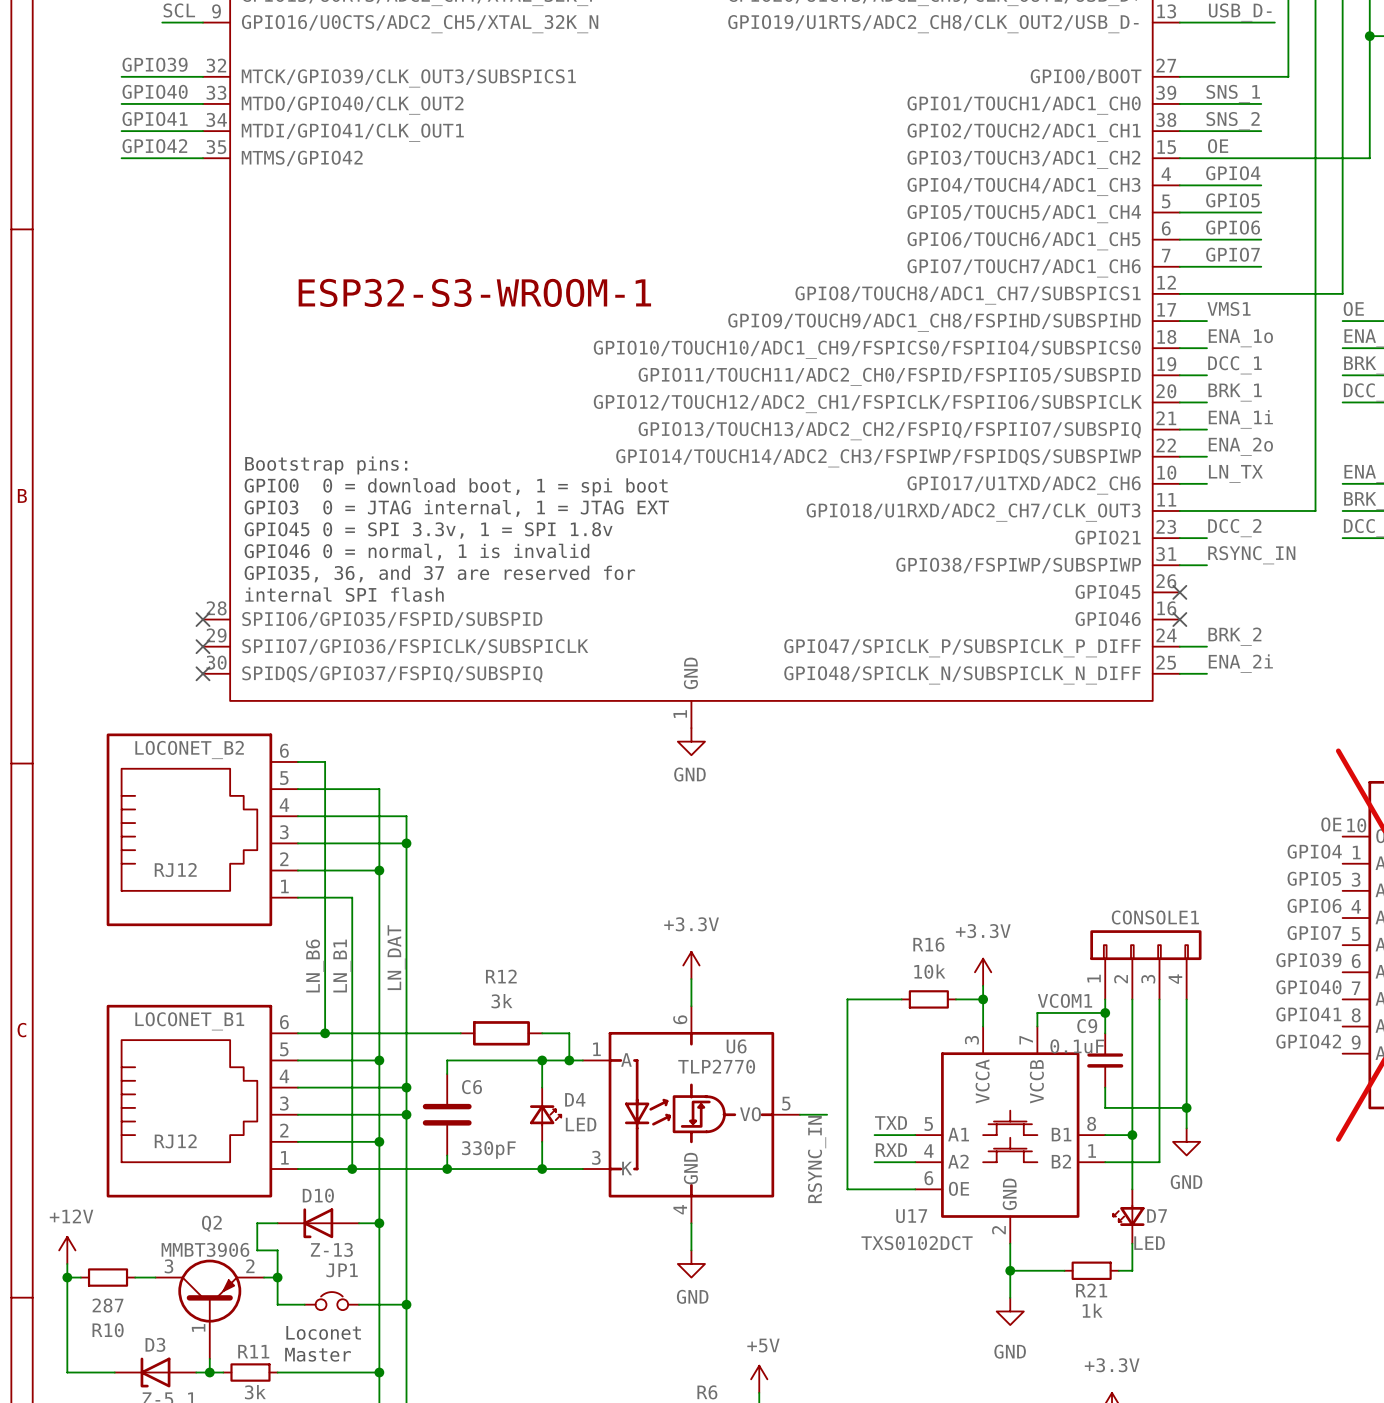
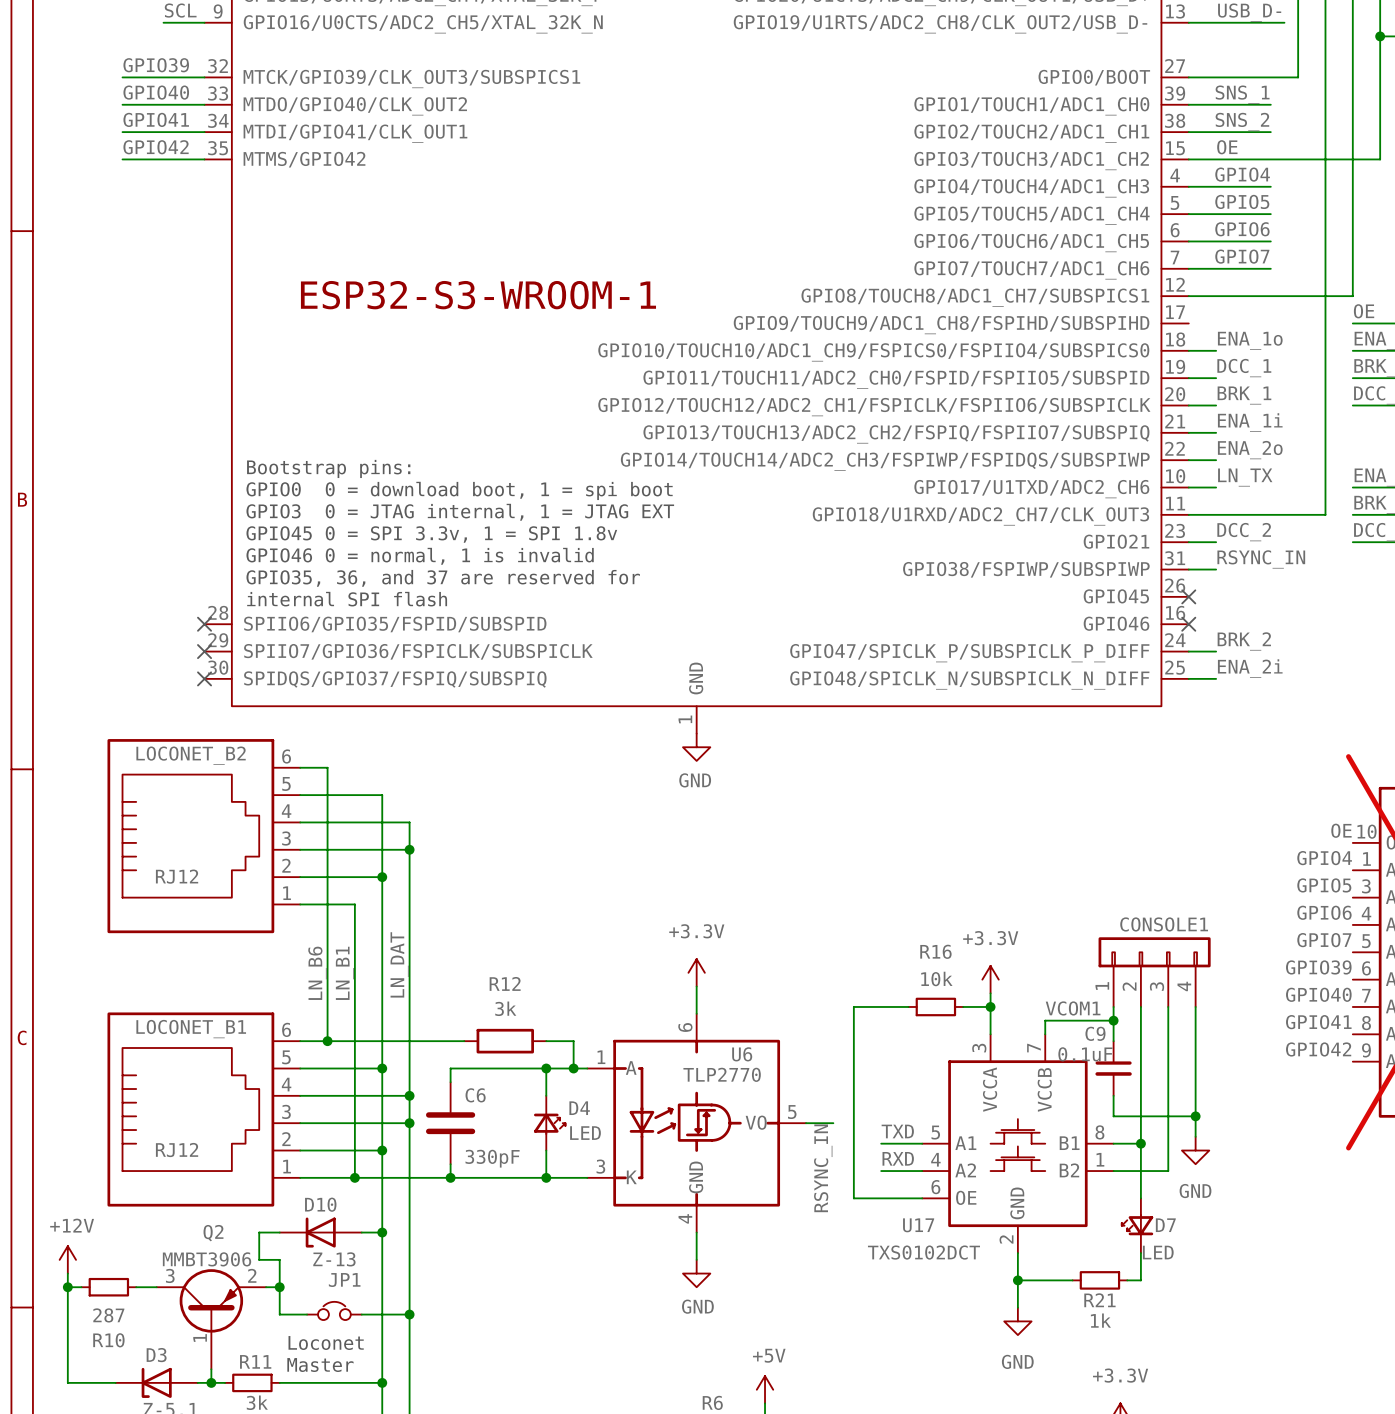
label: VMS1 (1229, 308) -> none
wire: (1179, 321) (1206, 321) -> none

